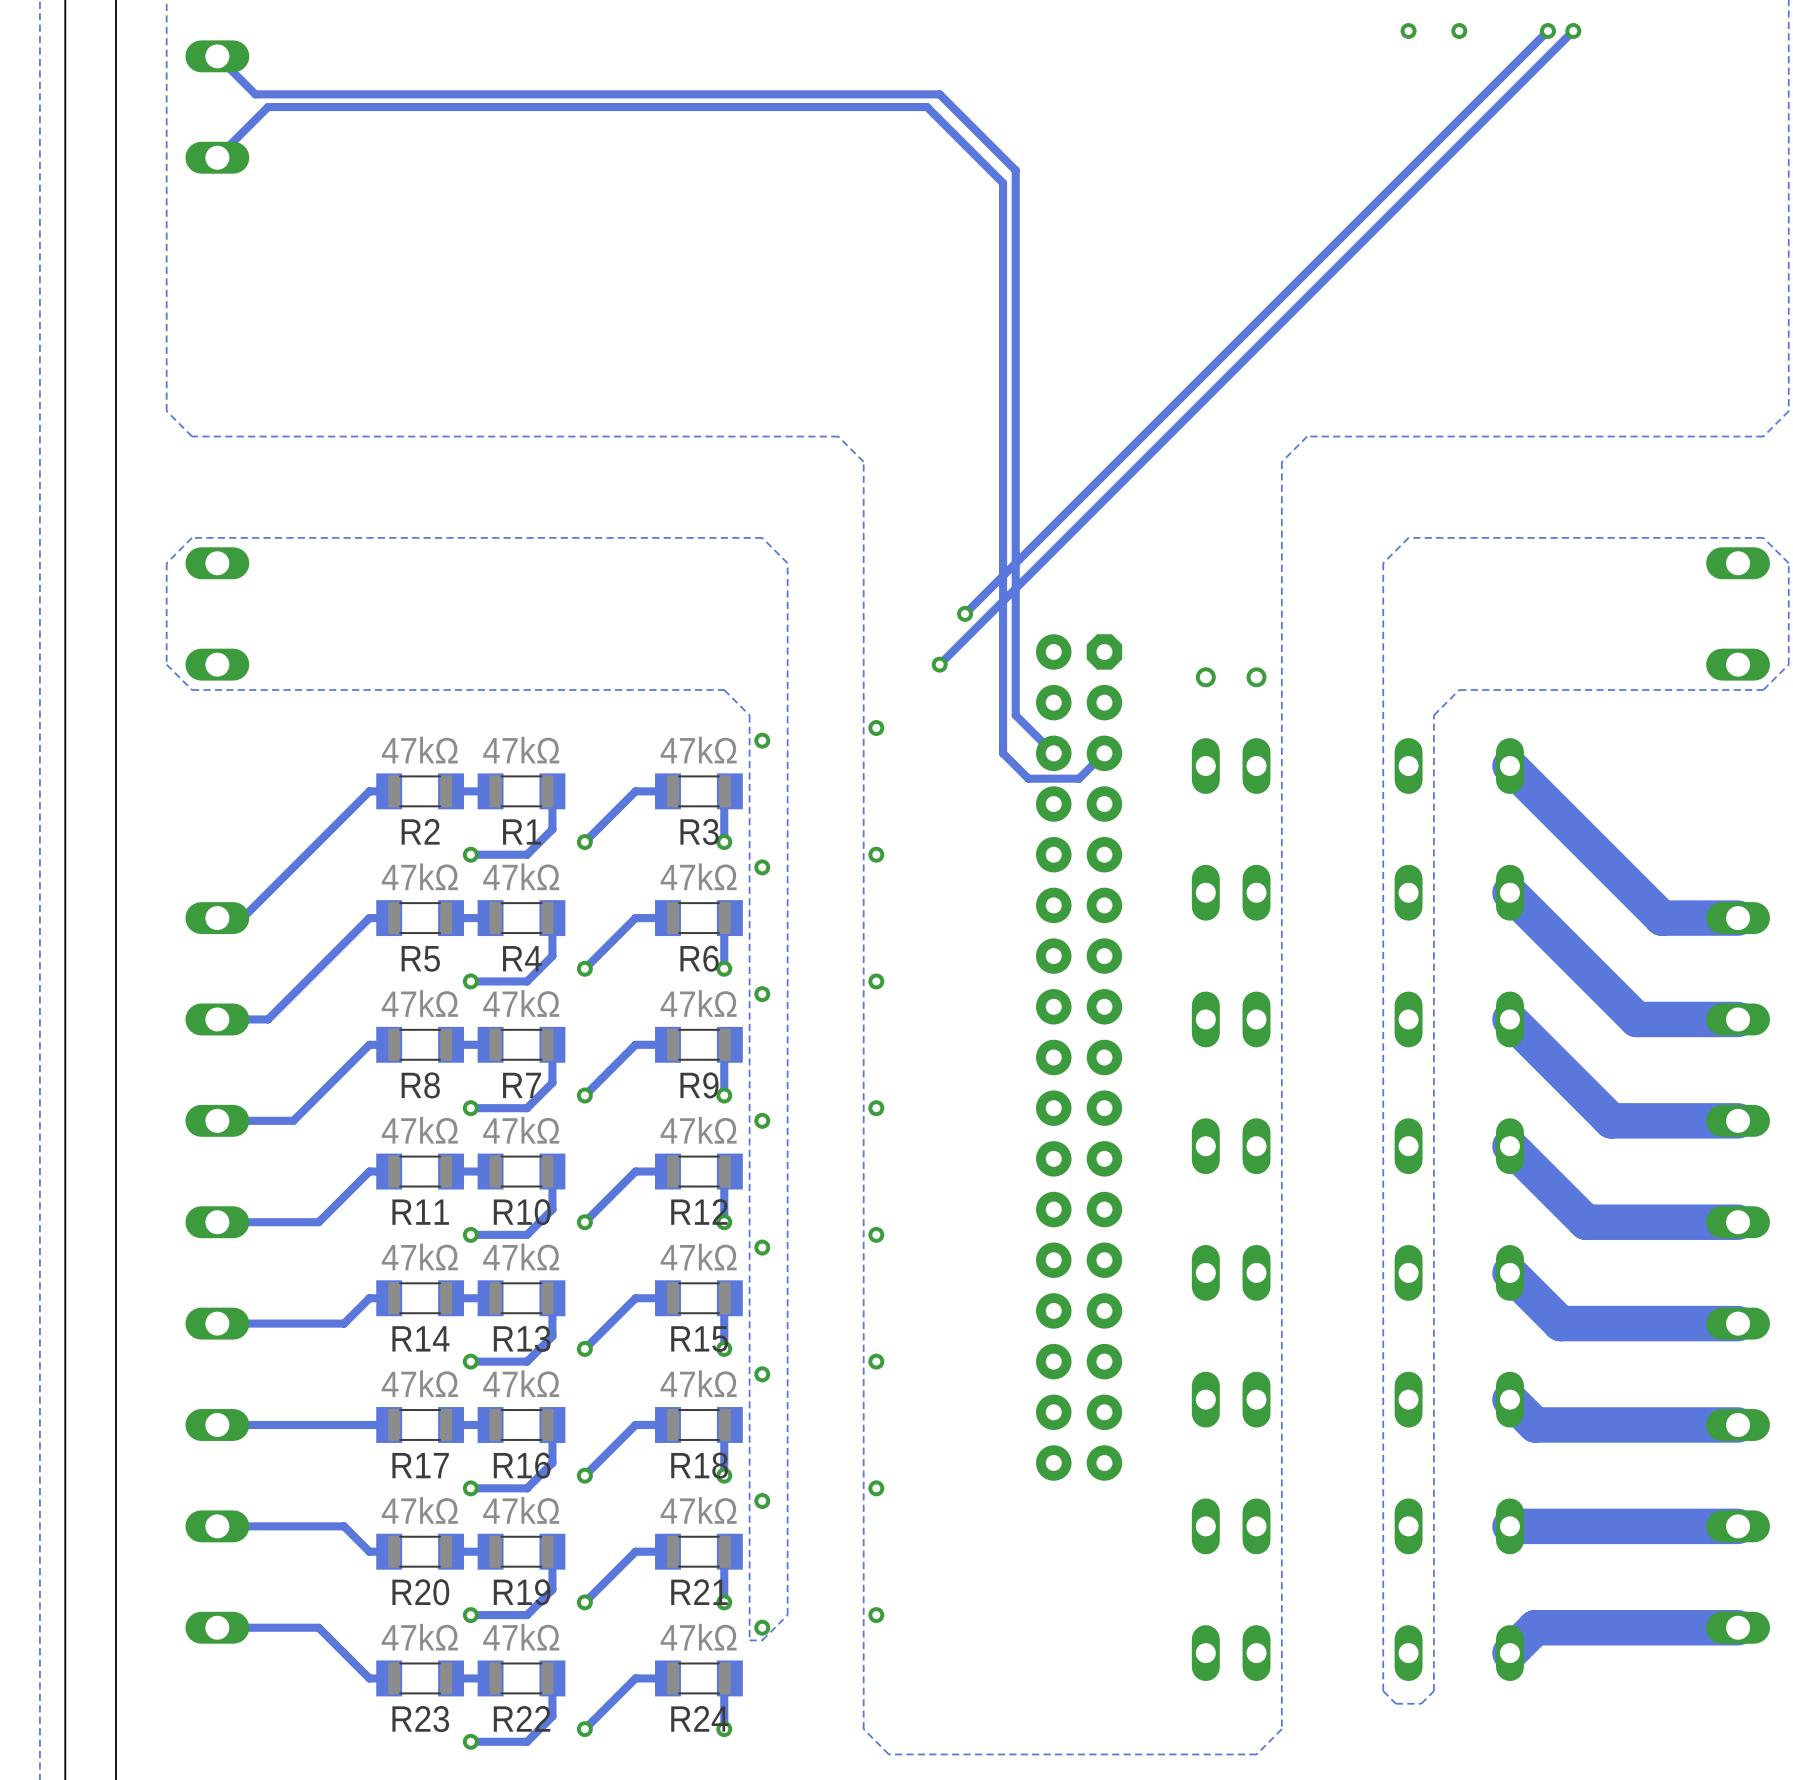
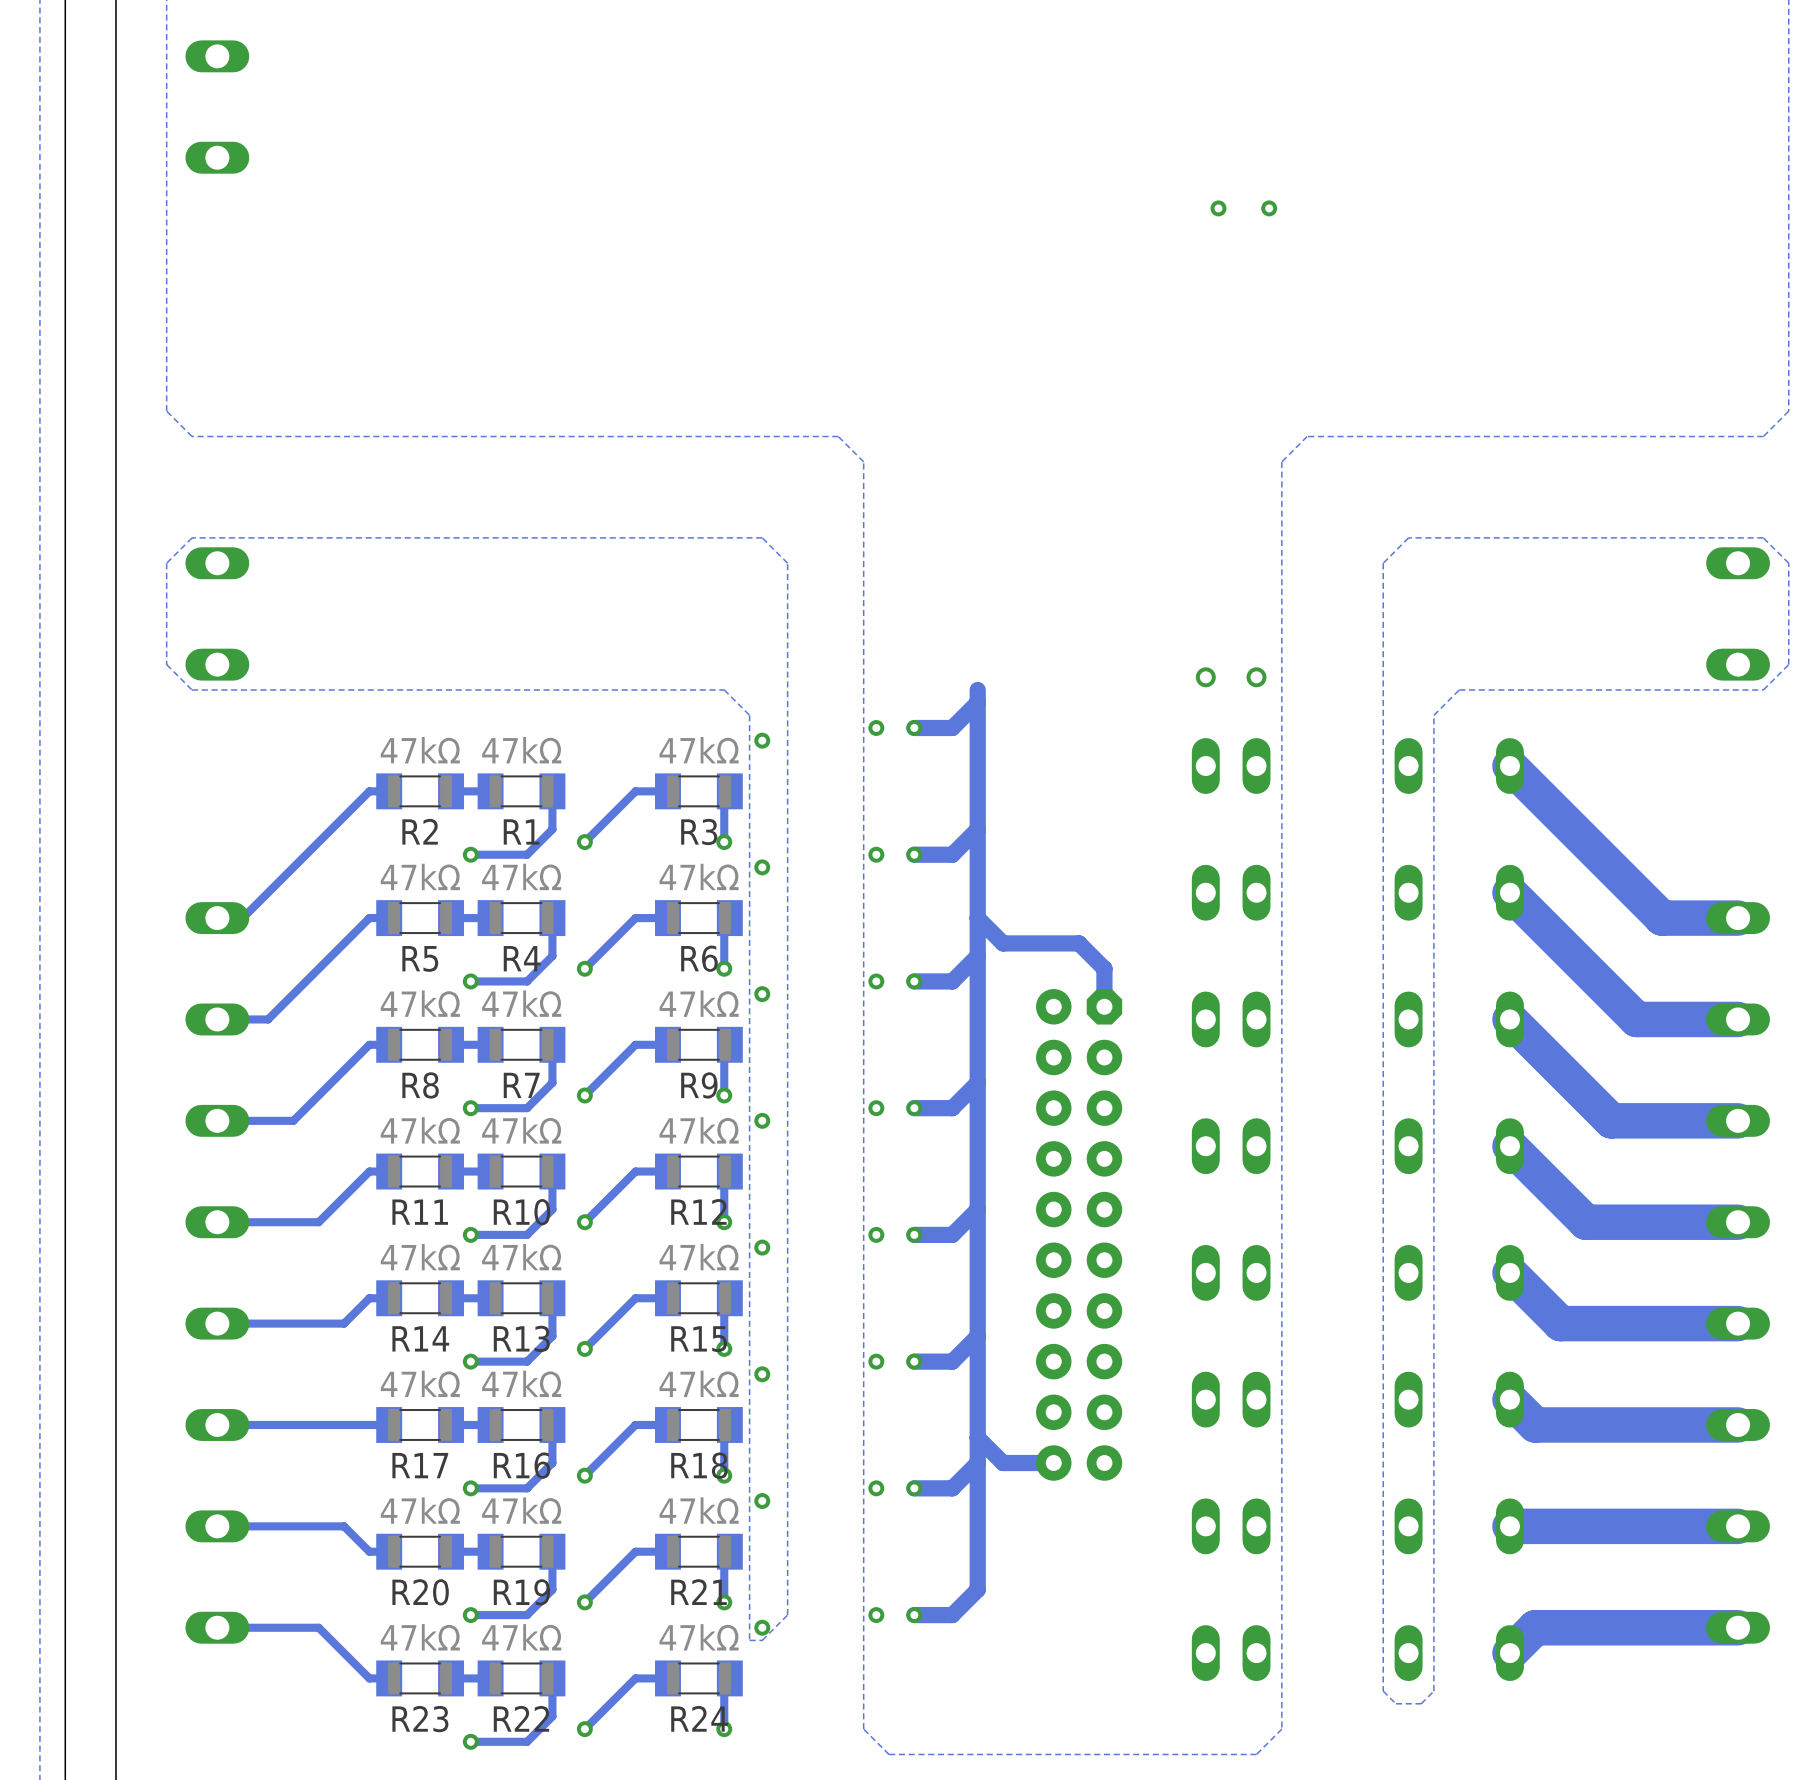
via: (1408, 31) -> none
via: (1459, 31) -> none
track: (1547, 31) (965, 613) -> none
via: (1547, 31) -> none
track: (1573, 31) (939, 664) -> none
via: (1573, 31) -> none
track: (217, 56) (255, 94) (939, 94) (1015, 170) (1015, 715) (1053, 753) -> none
track: (217, 157) (268, 107) (927, 107) (1003, 183) (1003, 753) (1028, 778) (1079, 778) (1104, 753) -> none
via: none -> (1218, 208)
via: none -> (1269, 208)
via: (965, 613) -> none
via: (939, 664) -> none
track: none -> (977, 689) (977, 1589) (952, 1615) (914, 1615)
track: none -> (977, 702) (952, 727) (914, 727)
via: none -> (914, 727)
track: none -> (977, 829) (952, 854) (914, 854)
via: none -> (914, 854)
track: none -> (977, 918) (1003, 943) (1079, 943) (1104, 968) (1104, 1006)
track: none -> (977, 956) (952, 981) (914, 981)
via: none -> (914, 981)
part: (1079, 1057) -> none
track: none -> (977, 1082) (952, 1108) (914, 1108)
via: none -> (914, 1108)
track: none -> (977, 1209) (952, 1234) (914, 1234)
via: none -> (914, 1234)
part: none -> (1079, 1234)
track: none -> (977, 1336) (952, 1361) (914, 1361)
via: none -> (914, 1361)
track: none -> (977, 1437) (1003, 1463) (1053, 1463)
track: none -> (977, 1463) (952, 1488) (914, 1488)
via: none -> (914, 1488)
via: none -> (914, 1615)

